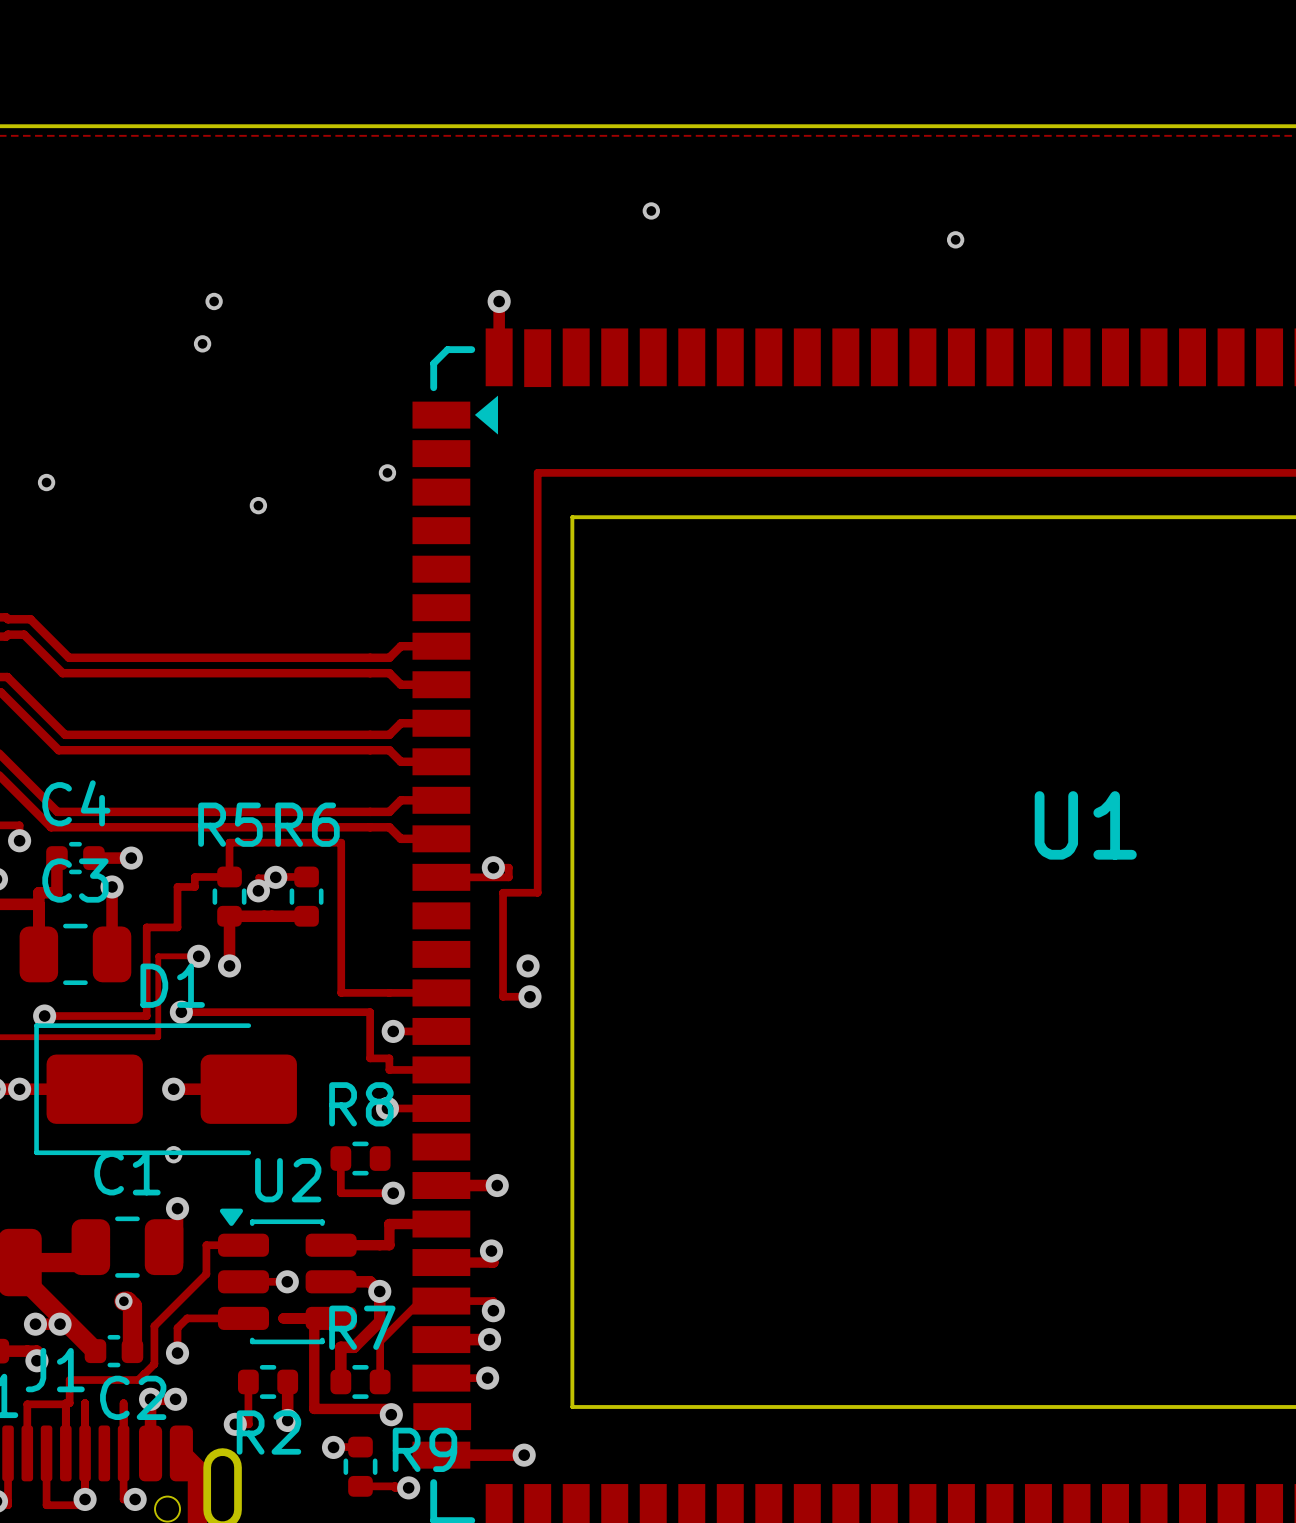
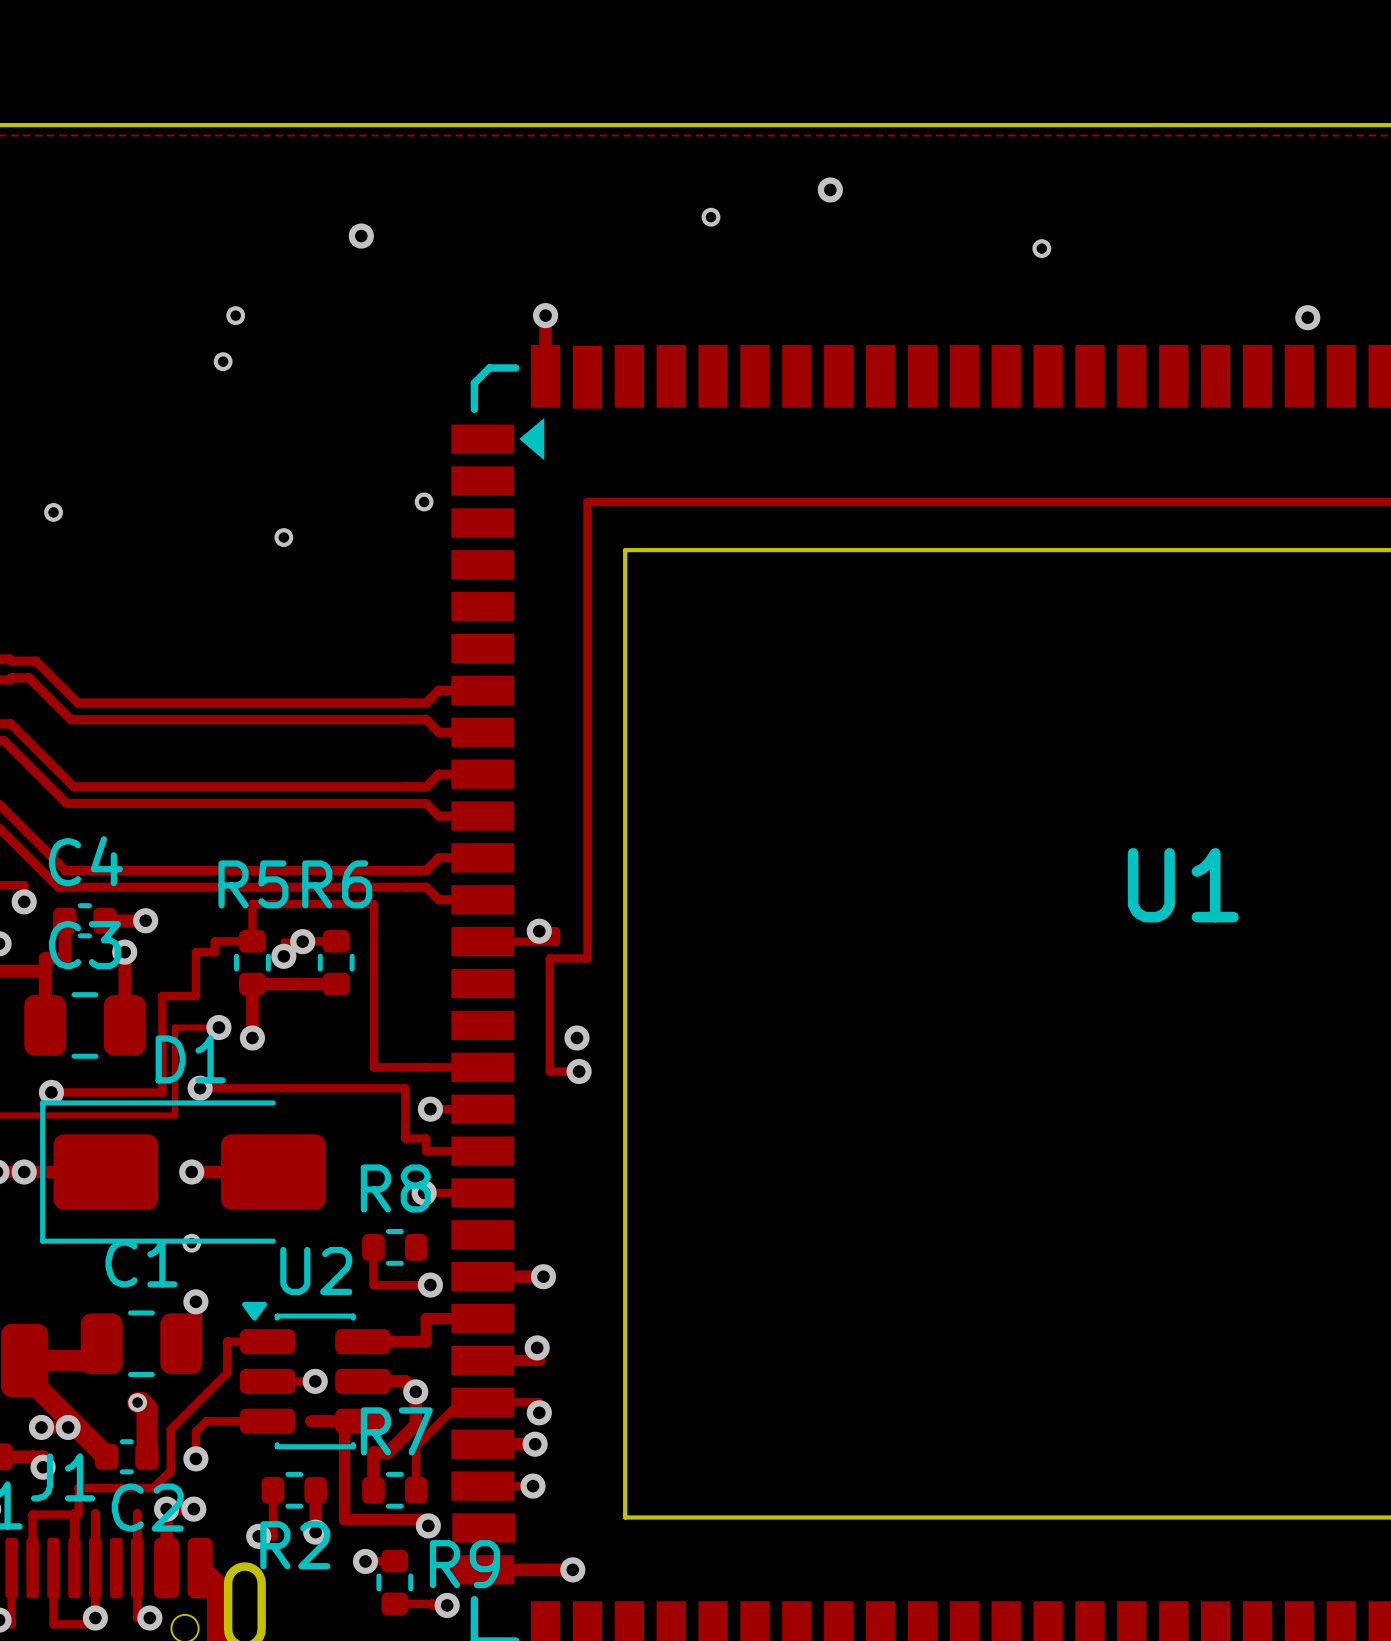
via: none -> (830, 189)
via: none -> (361, 236)
via: none -> (1307, 317)

